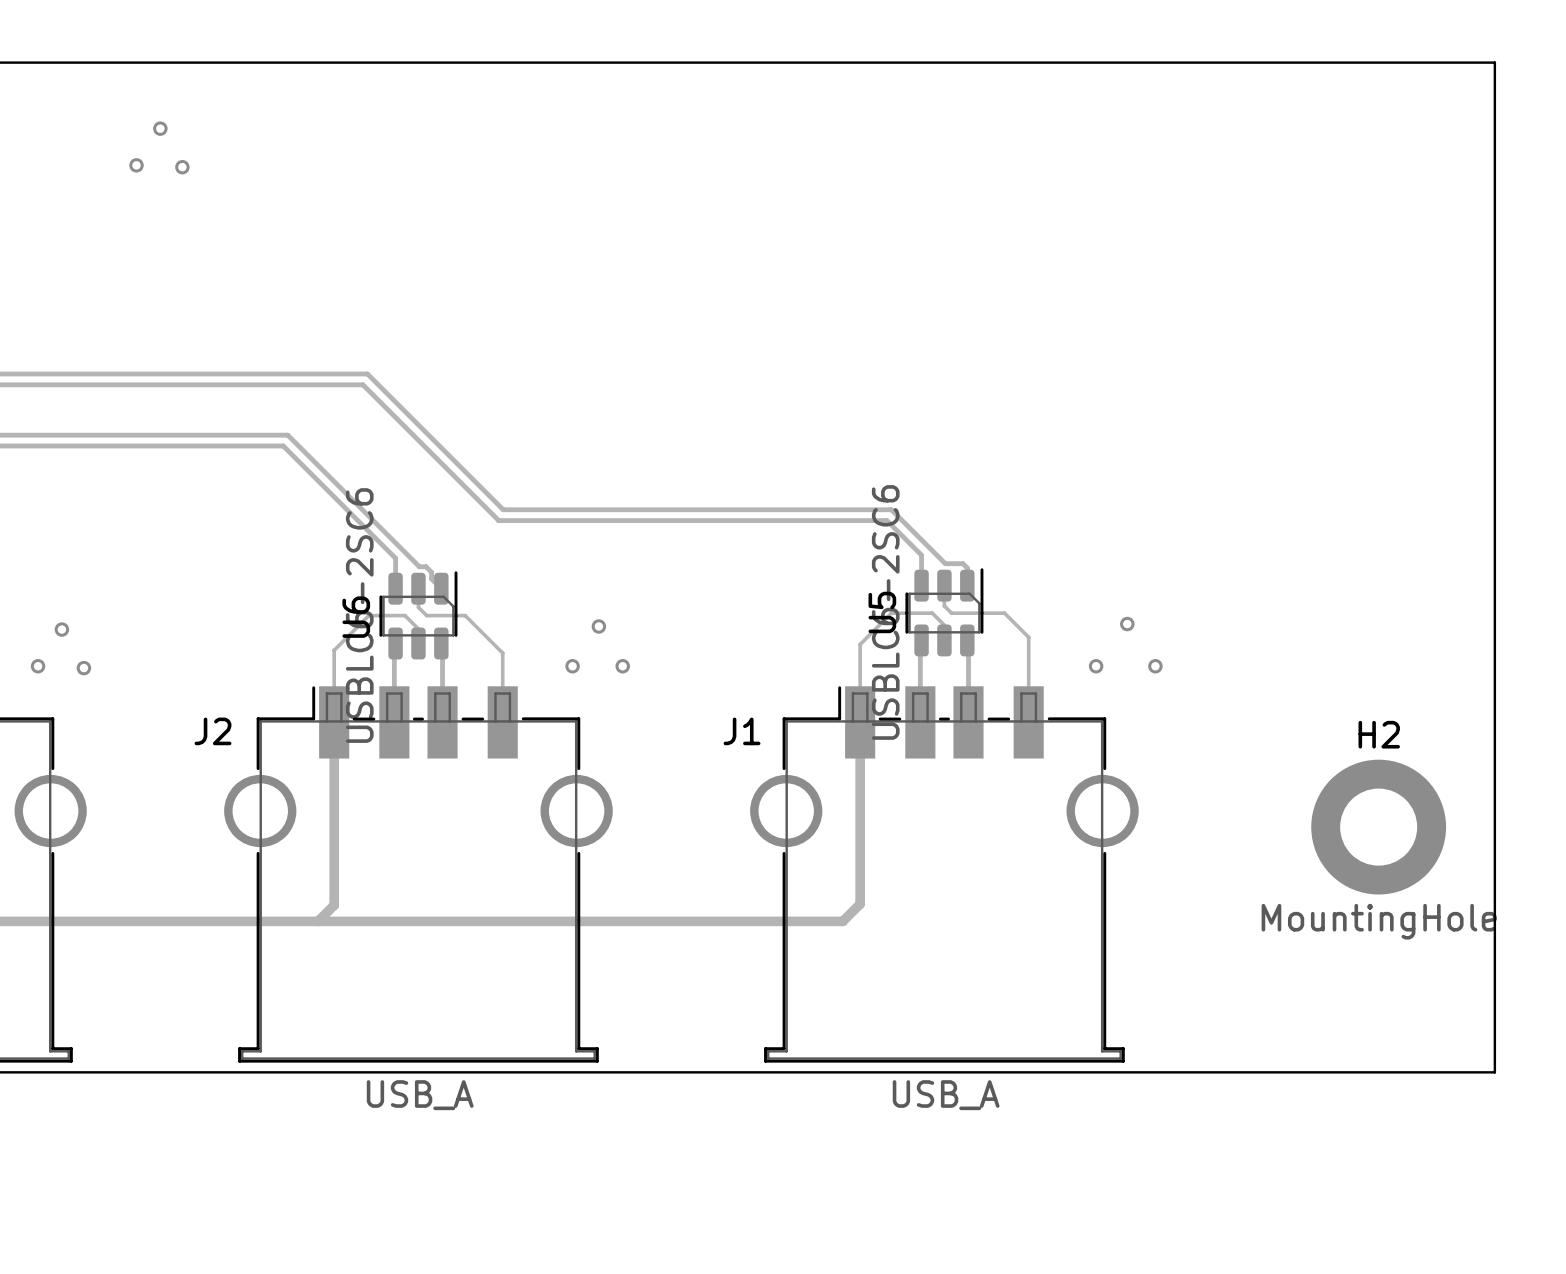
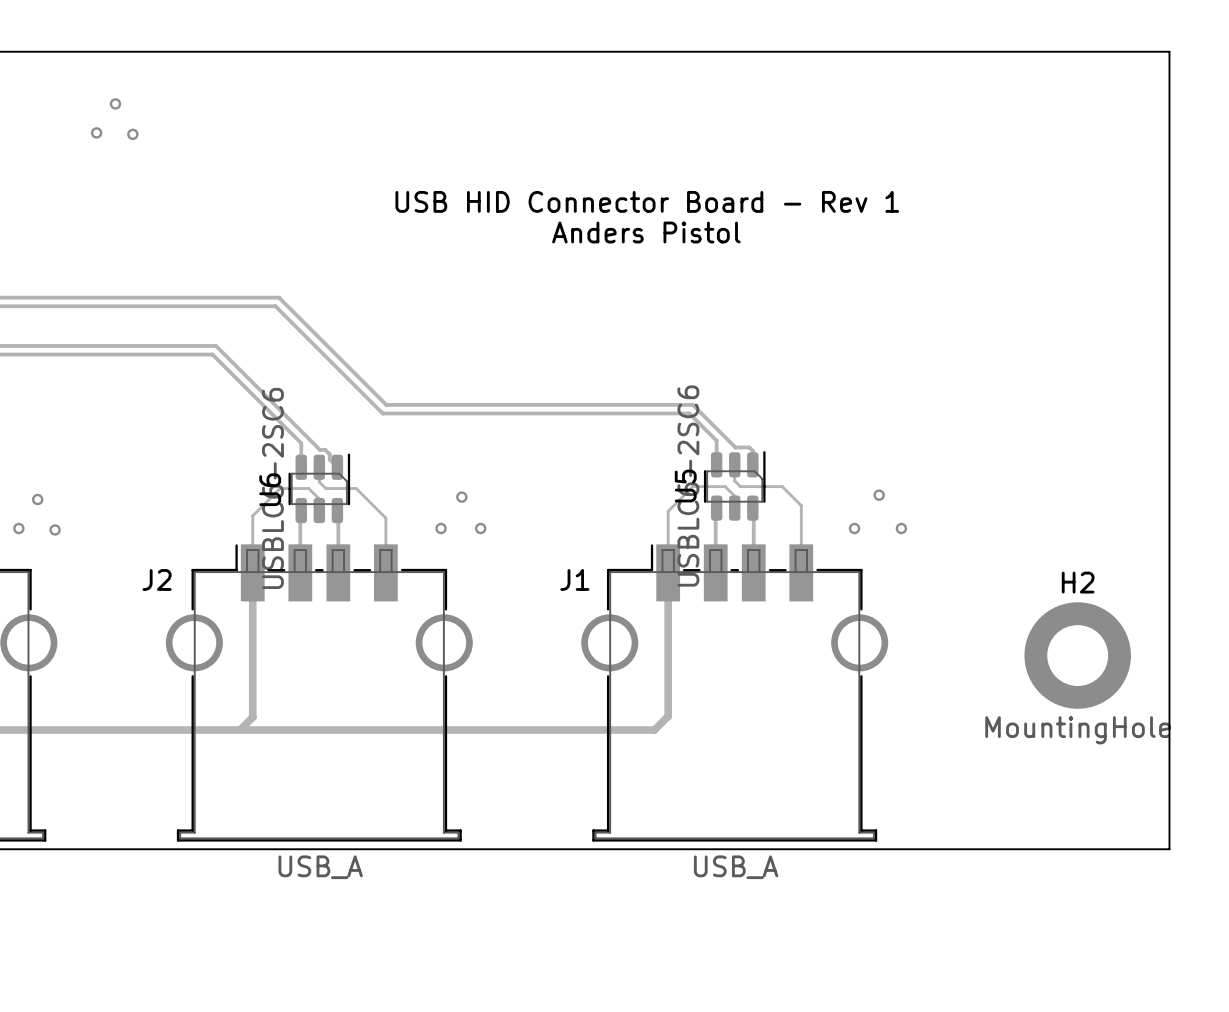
text: none -> USB HID Connector Board - Rev 1 (647, 201)
text: none -> Anders Pistol (646, 232)

